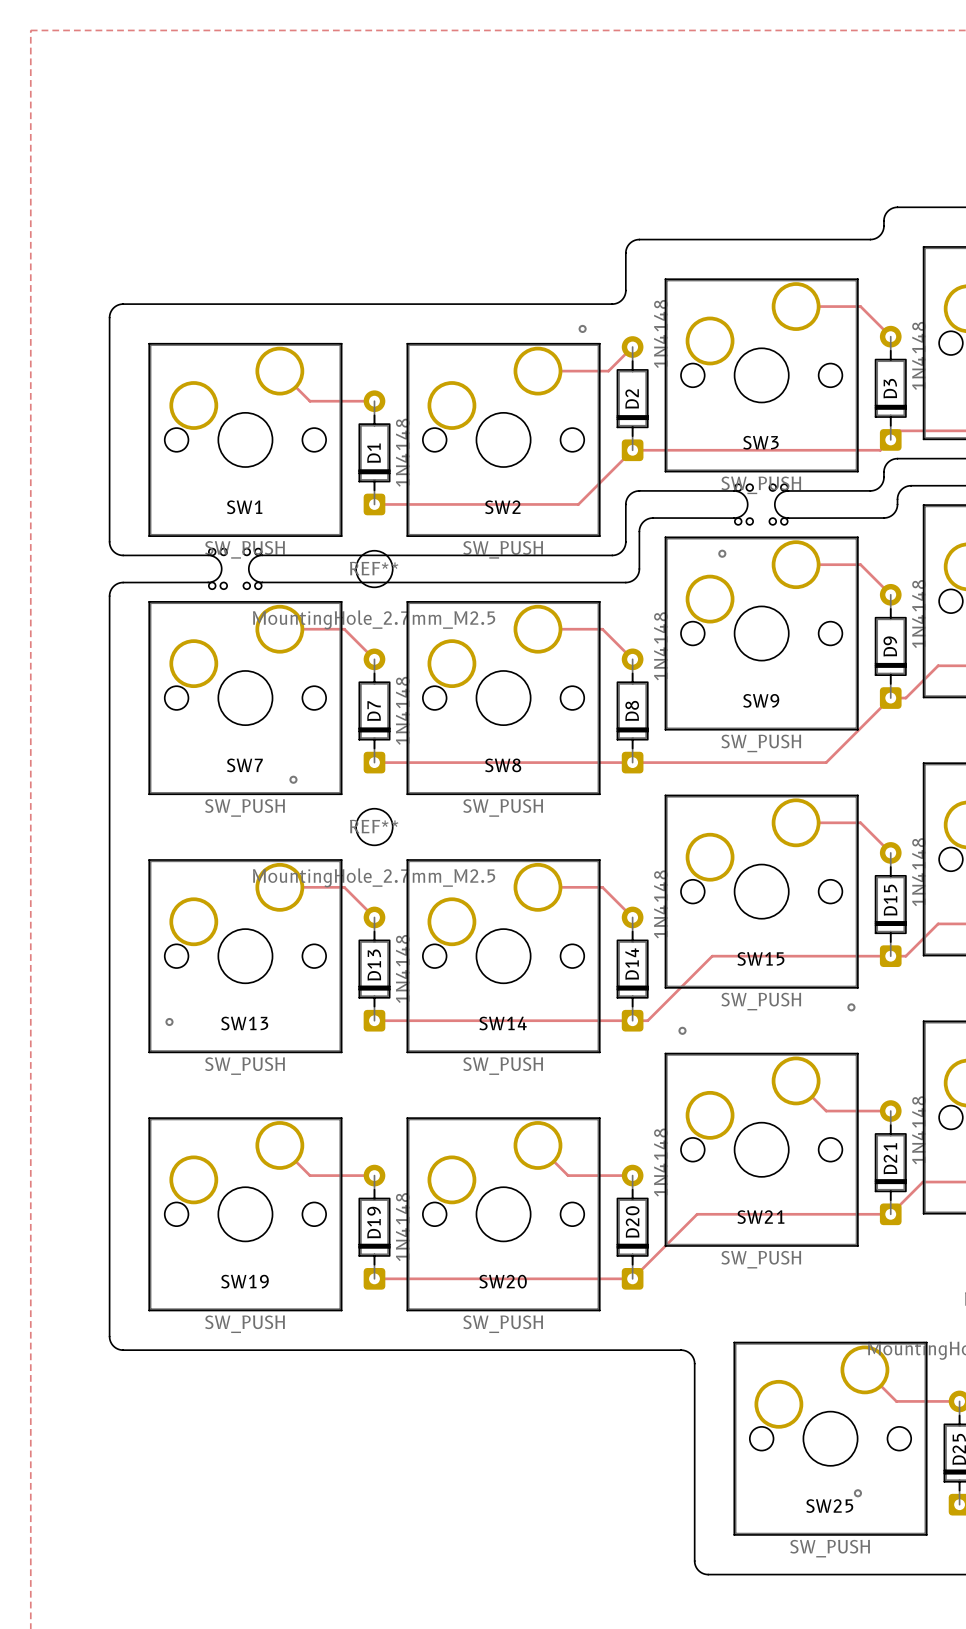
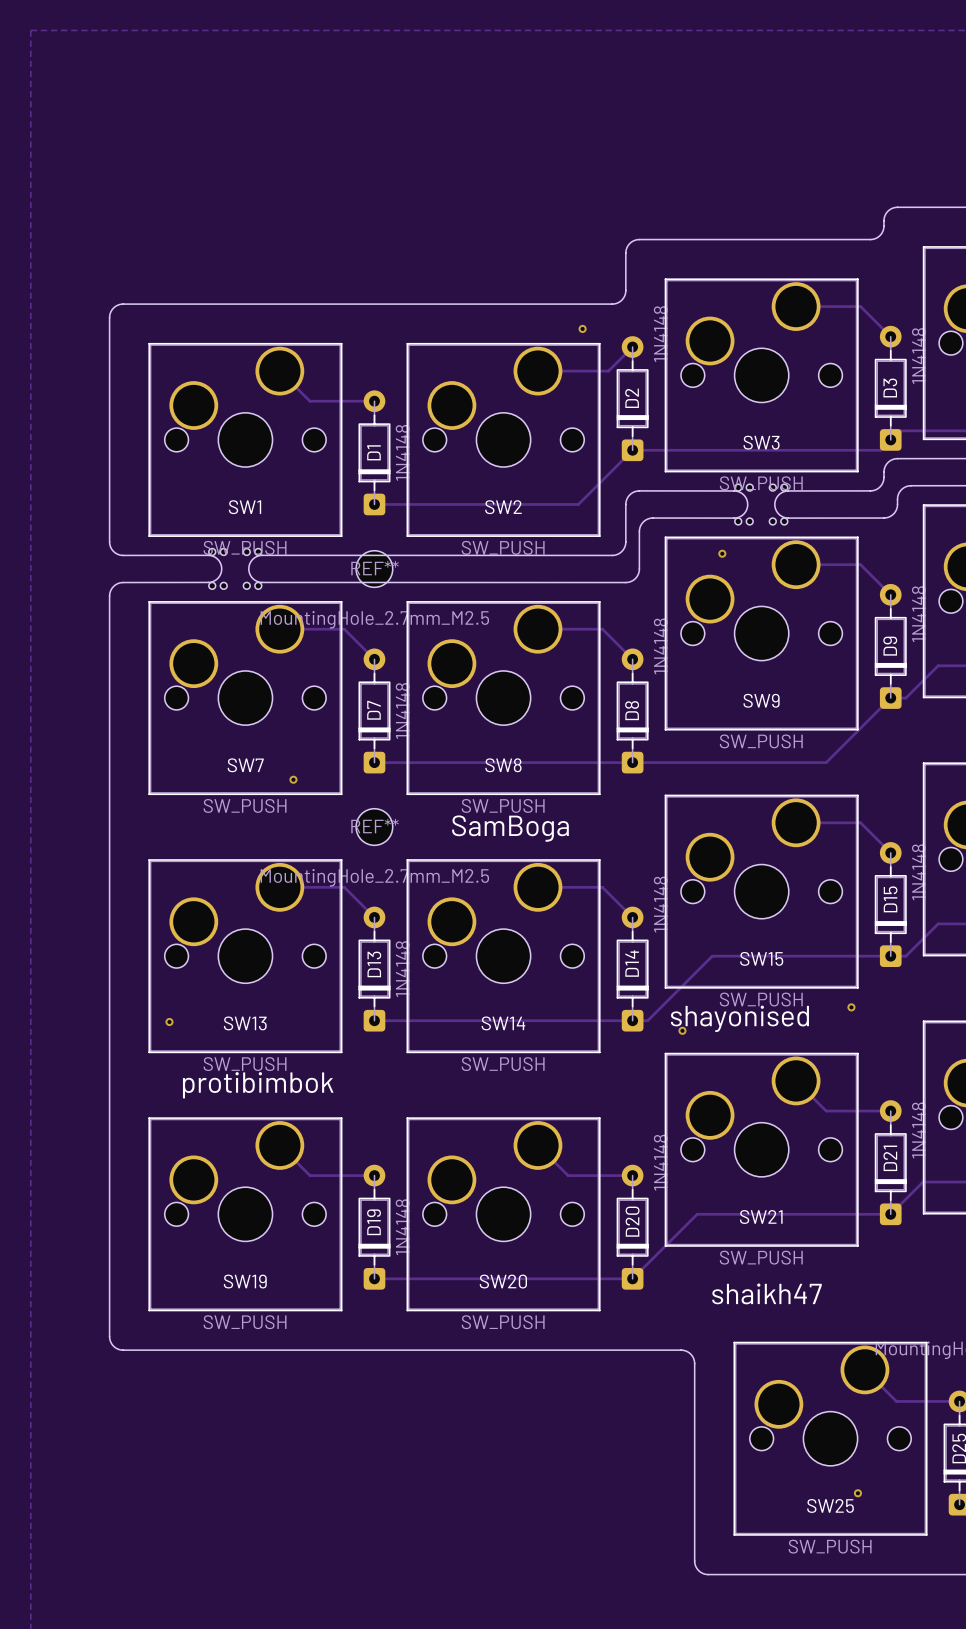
text: none -> SamBoga (510, 828)
text: none -> shayonised (739, 1018)
text: none -> protibimbok (258, 1085)
text: none -> shaikh47 (767, 1293)

